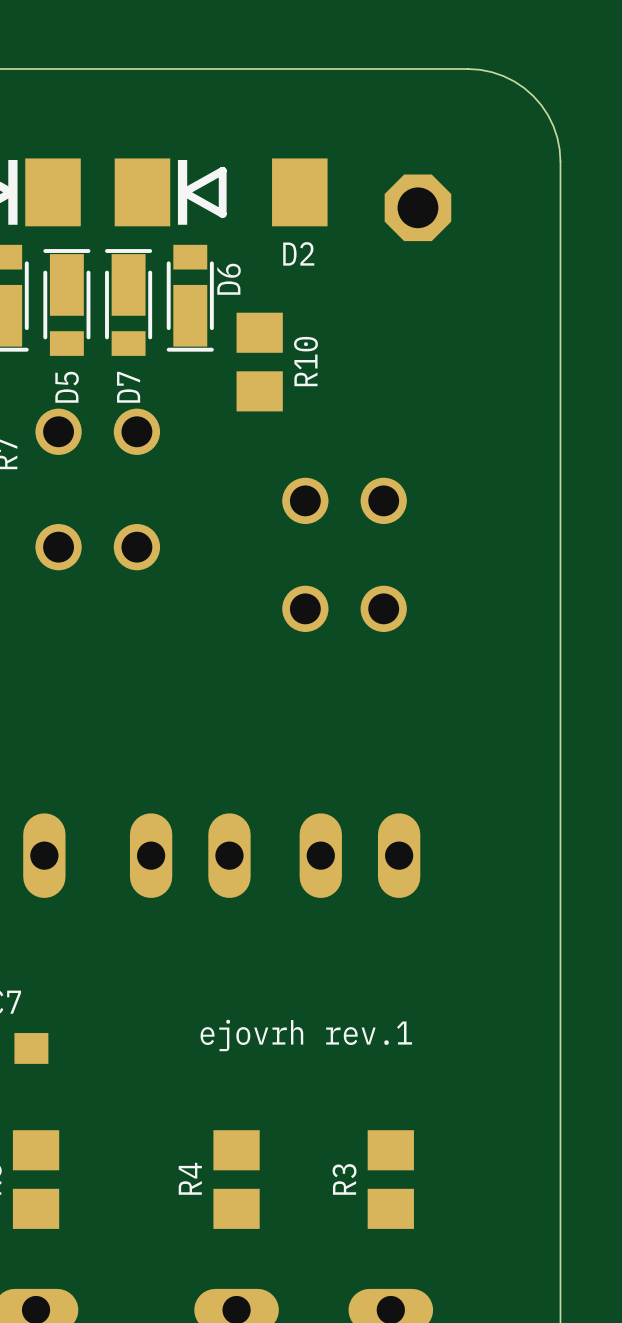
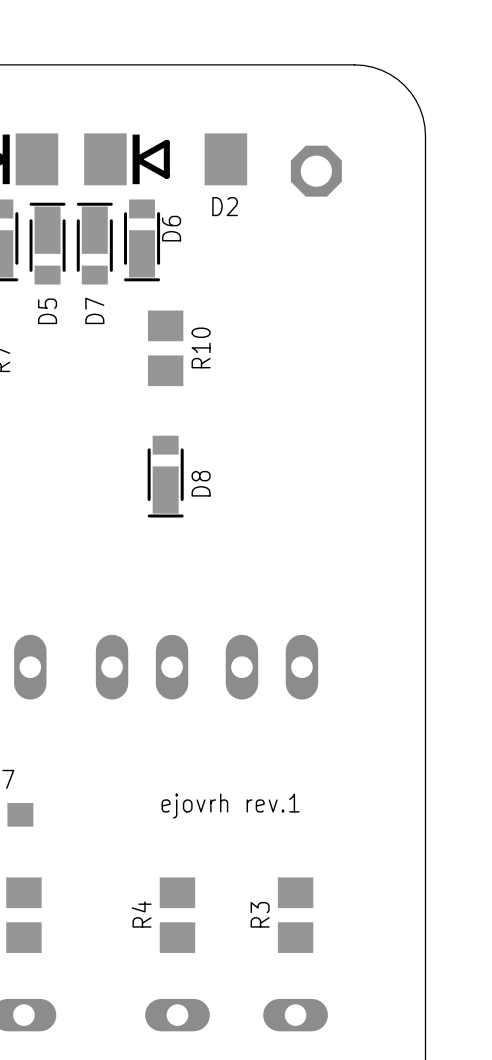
R10 position: (259, 362) -> (165, 348)
part: (97, 431) -> none
part: (344, 500) -> none
part: (97, 547) -> none
D8: none -> (165, 476)
part: (344, 608) -> none

